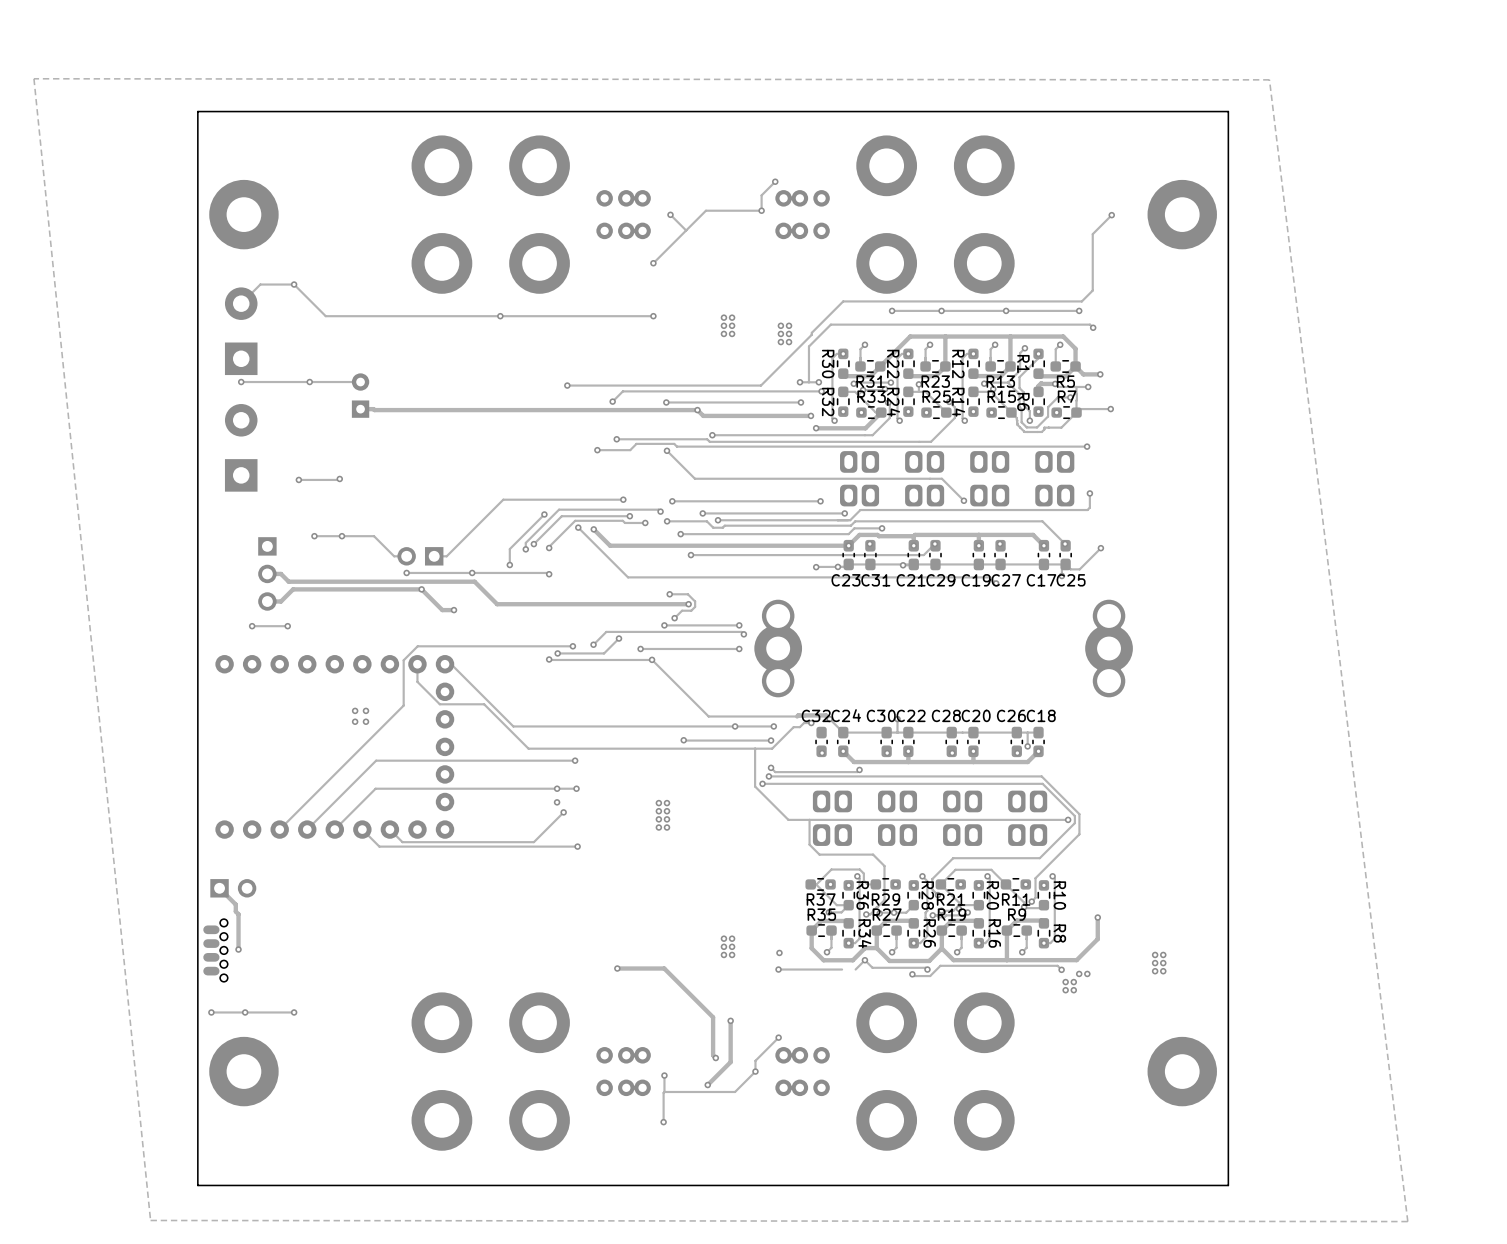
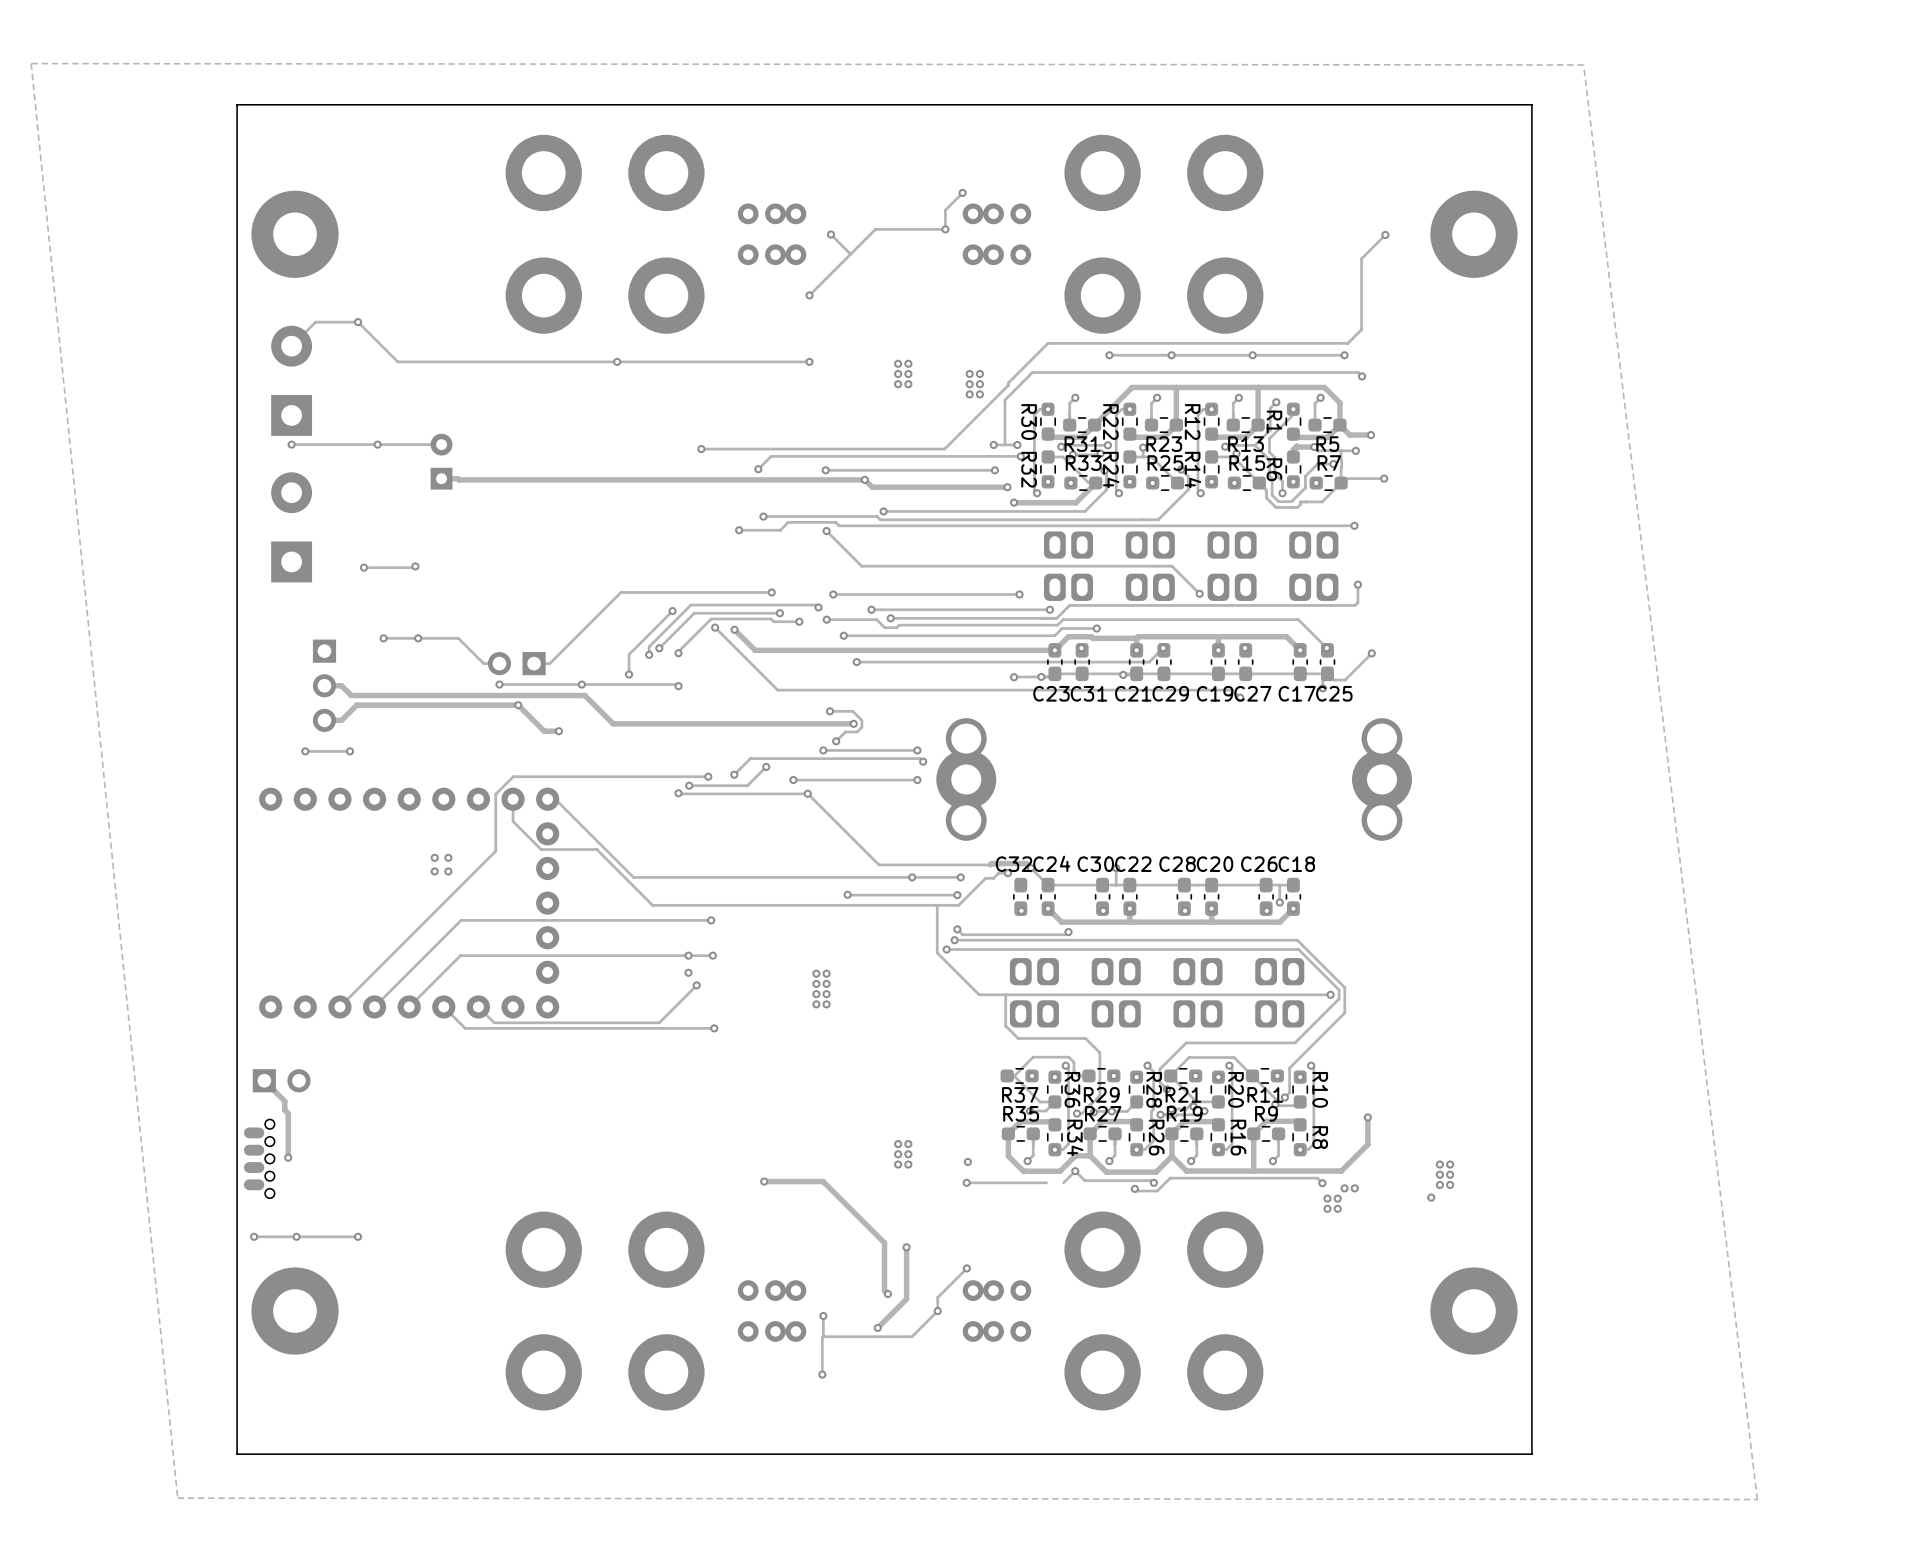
via: none -> (1431, 1197)

